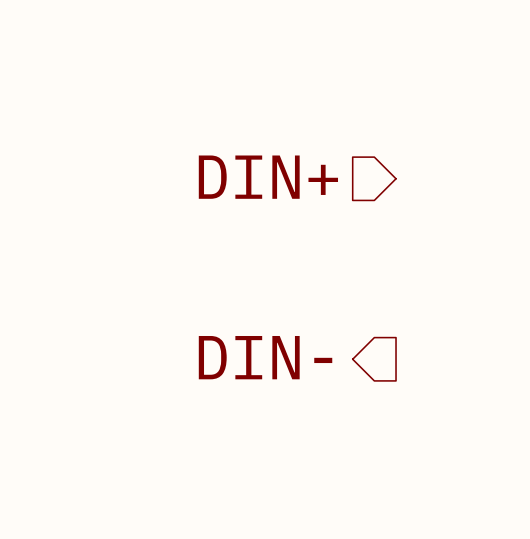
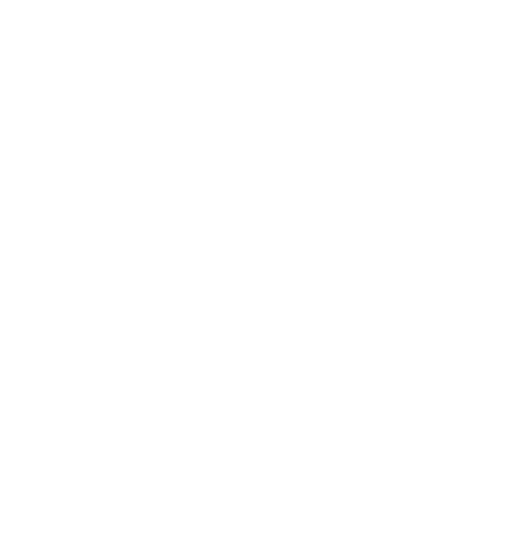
hierarchical label: DIN+ (268, 177) -> none
hierarchical label: DIN- (265, 357) -> none

